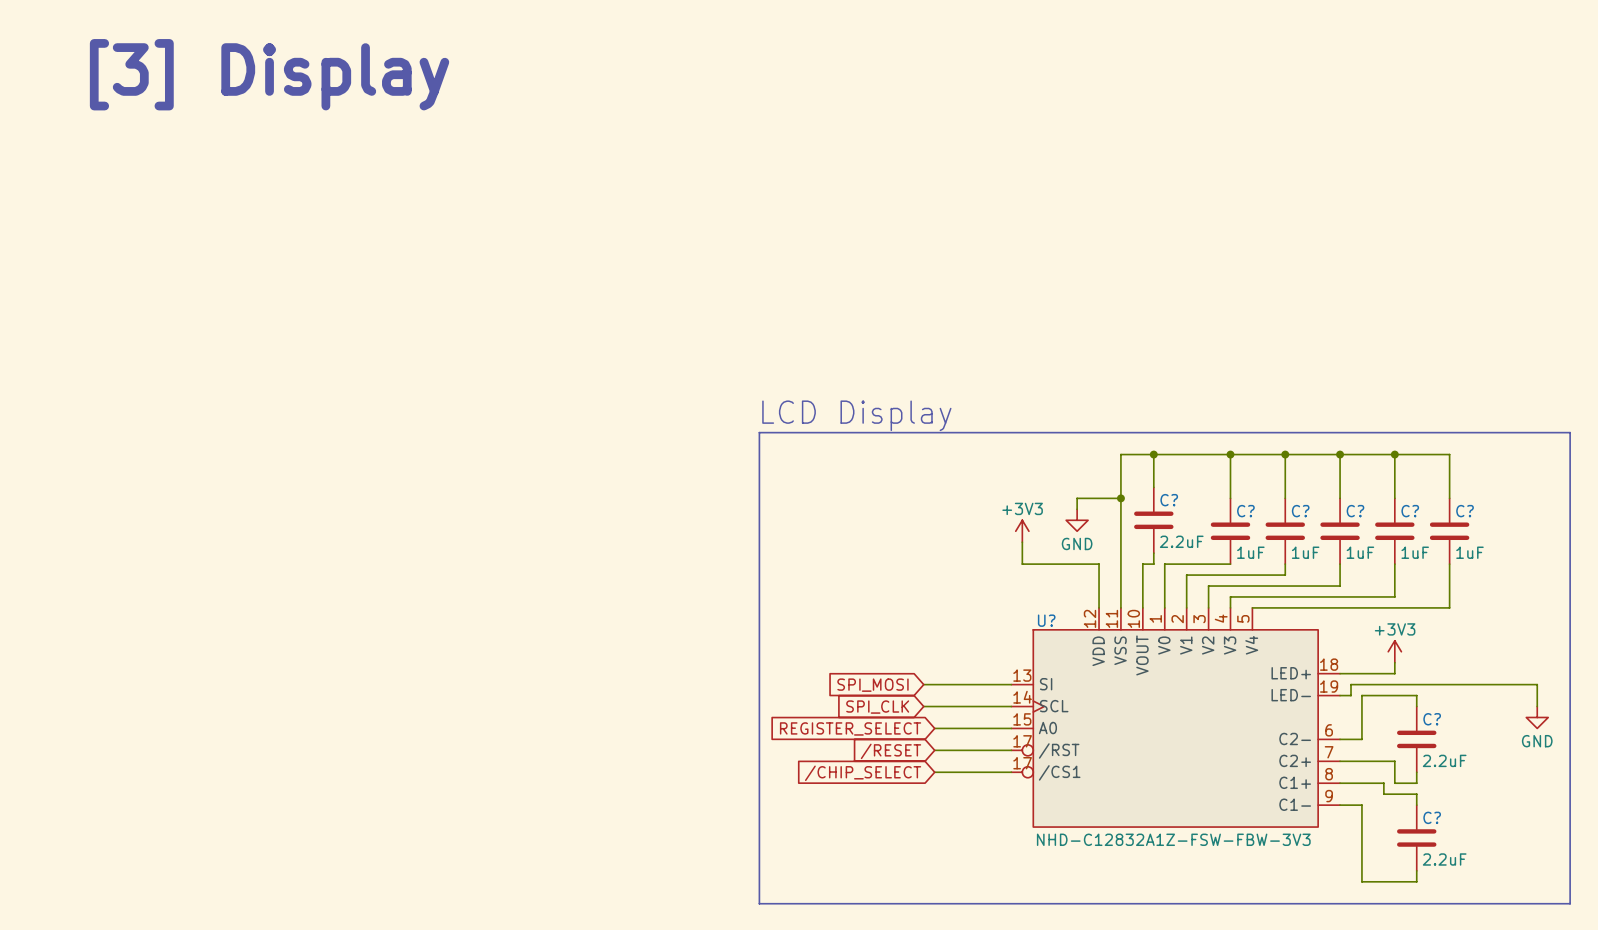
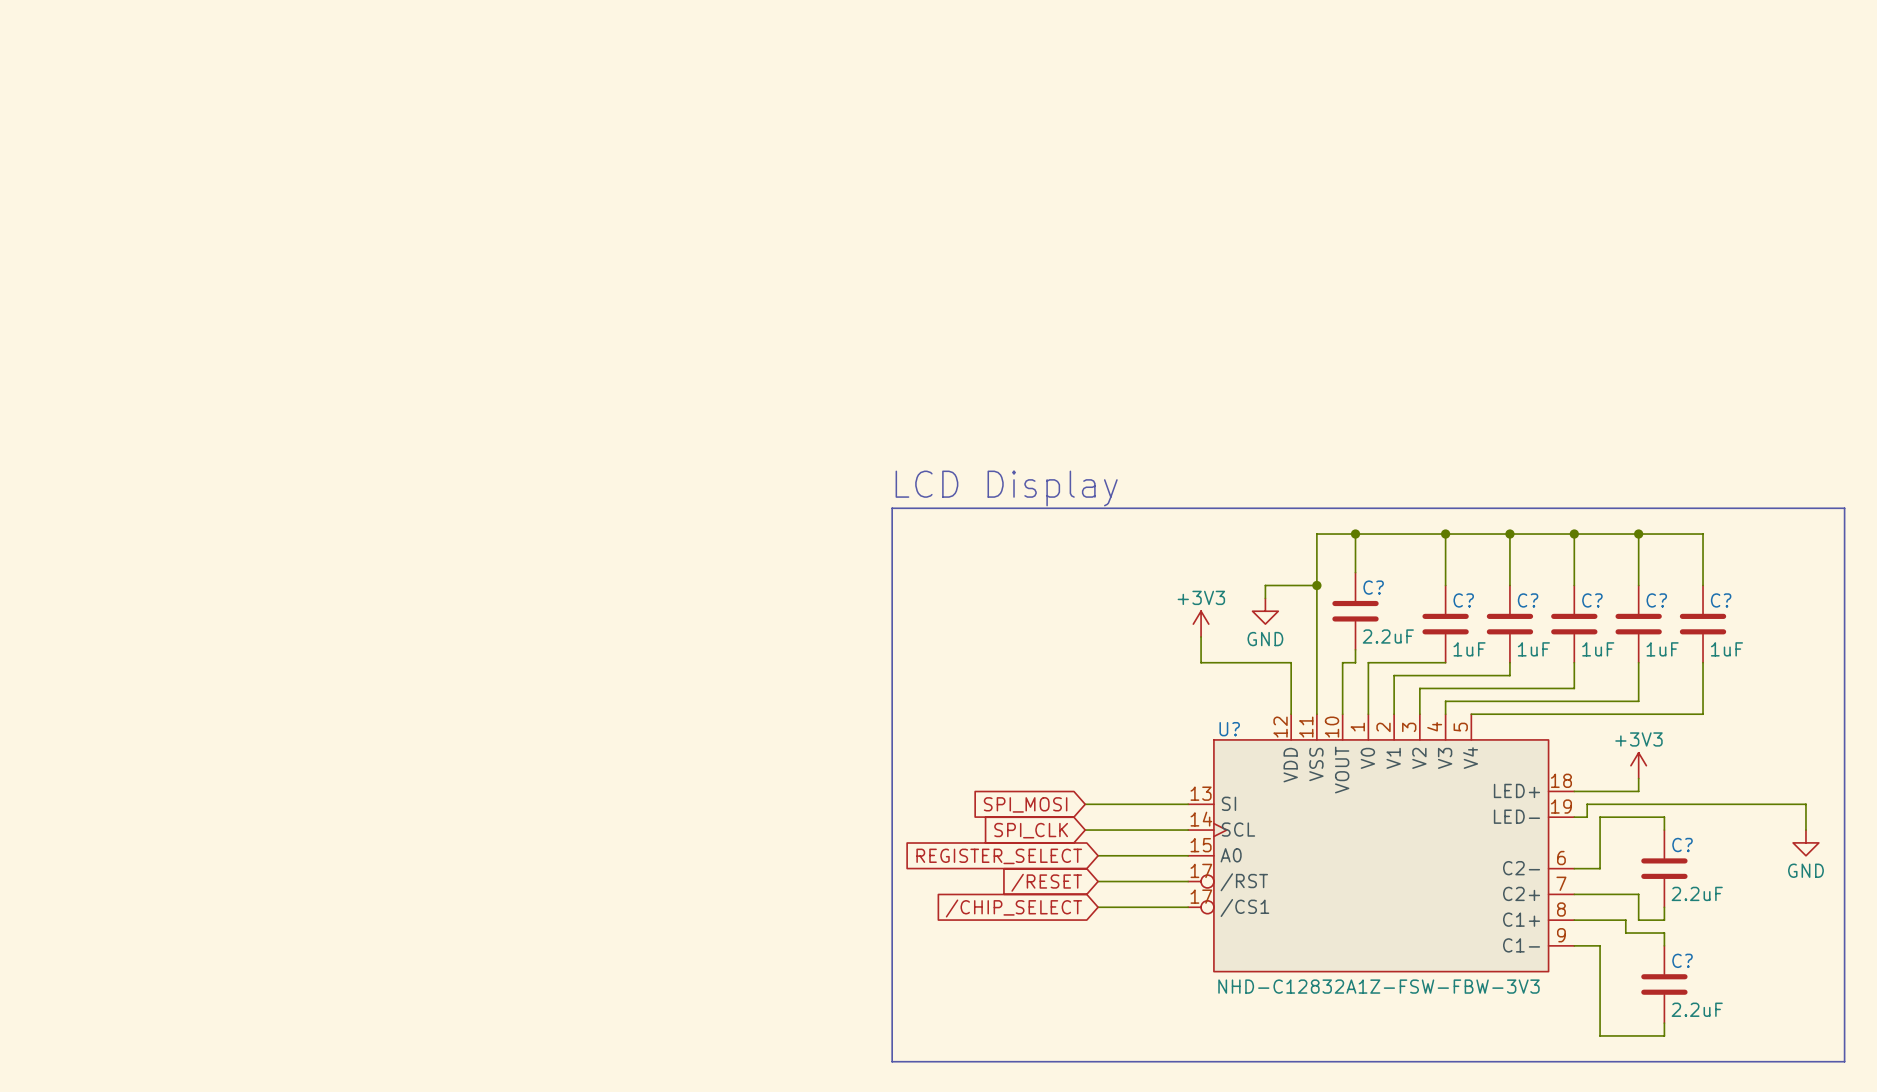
text: [3] Display (269, 74) -> none

